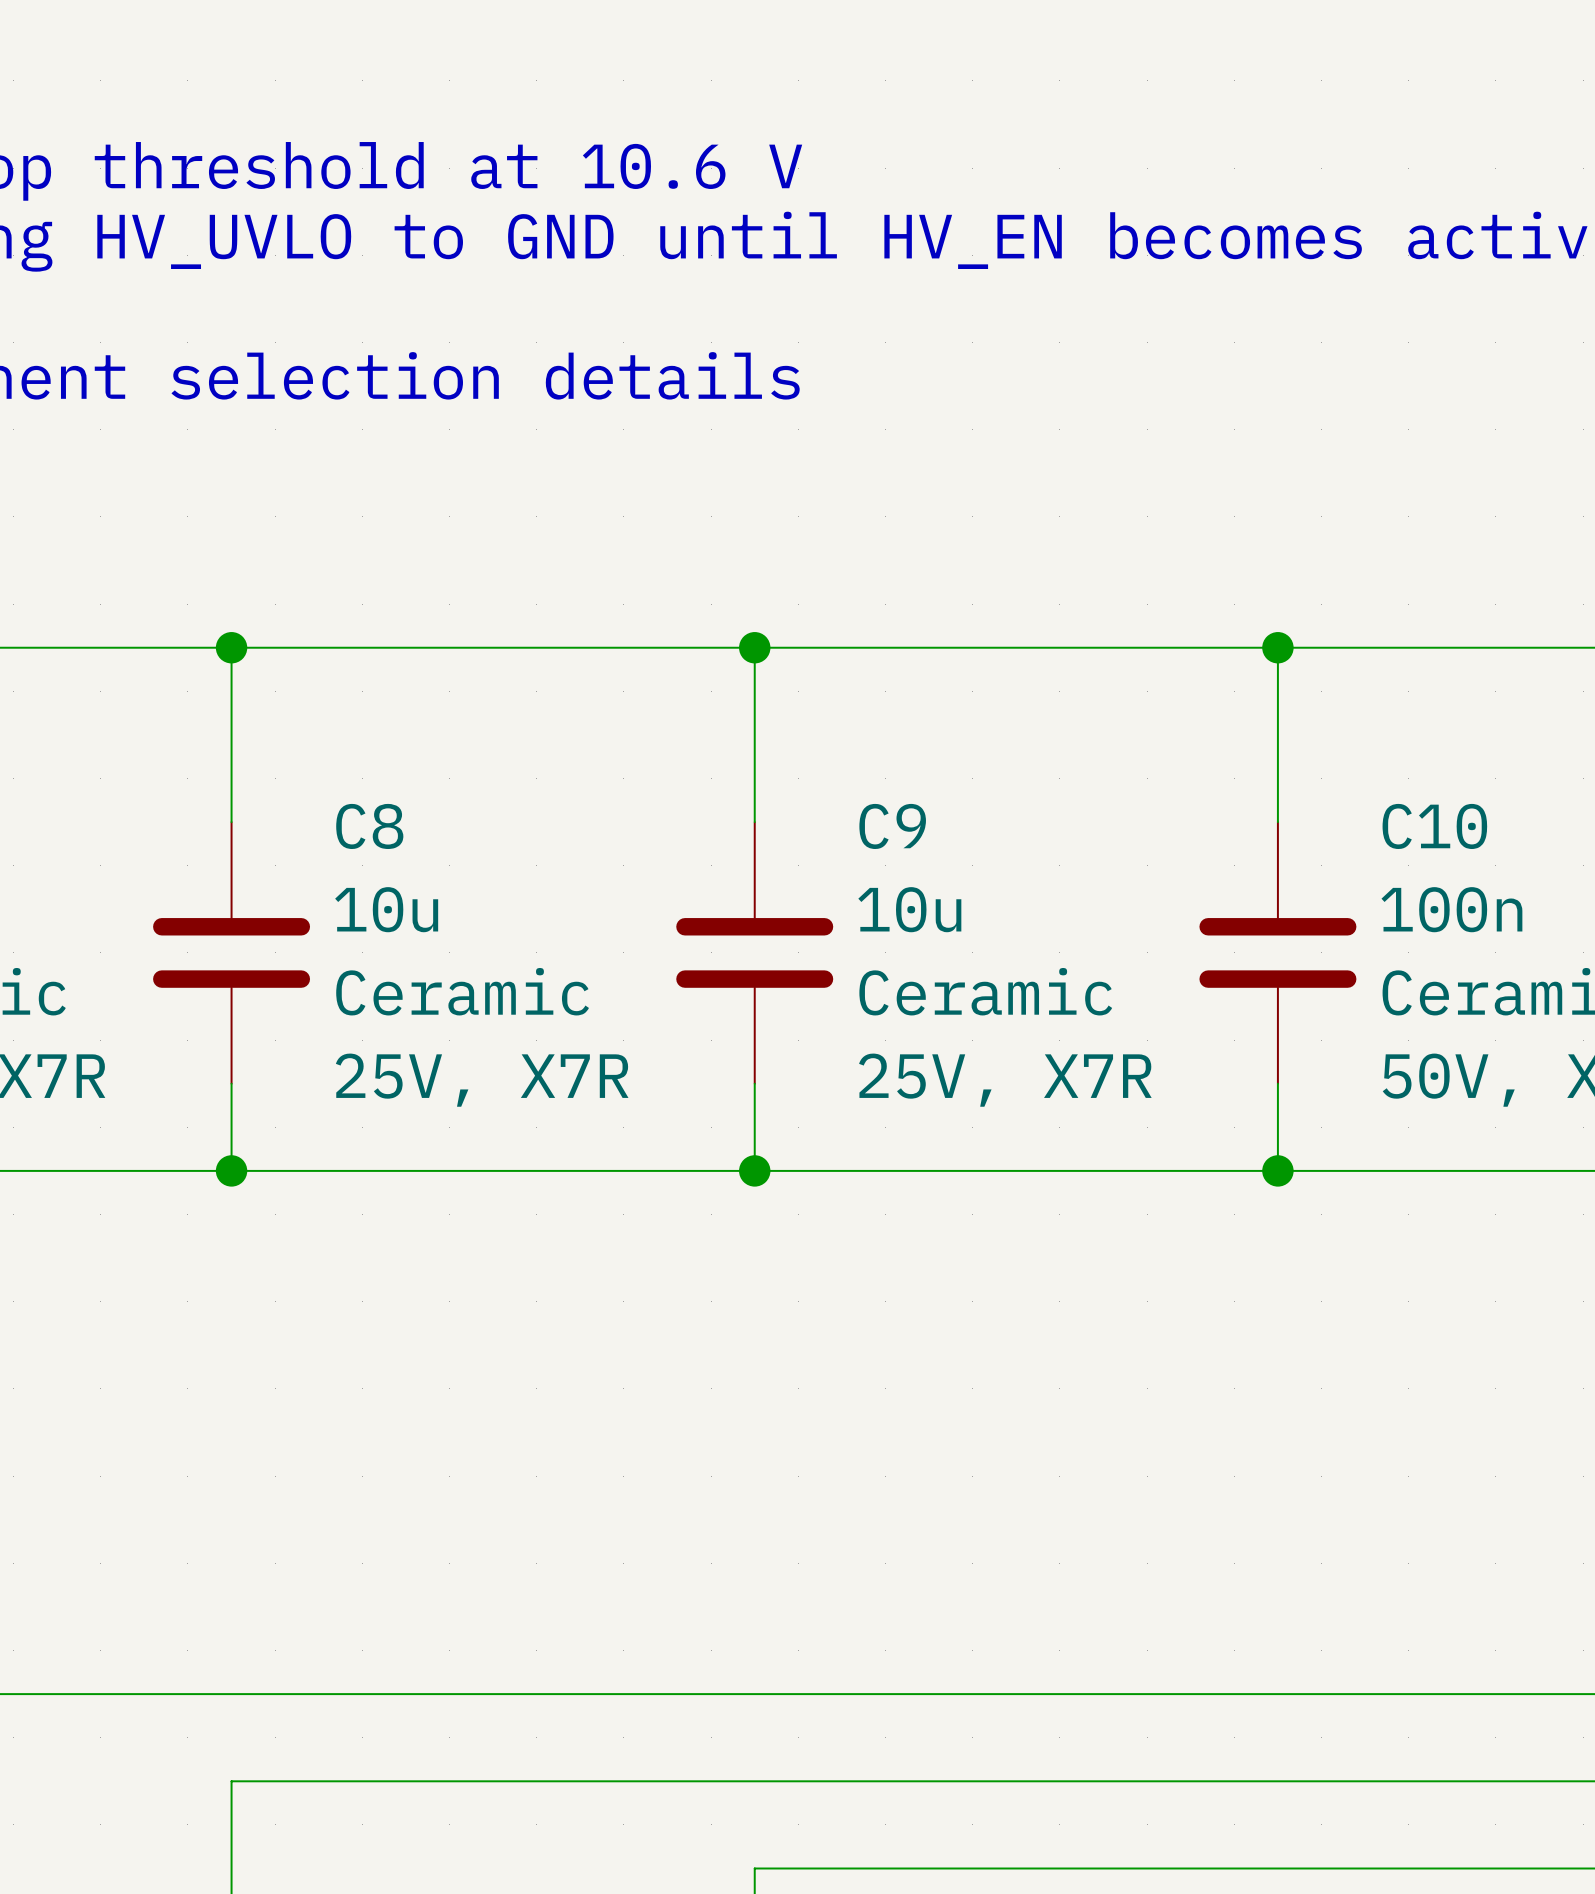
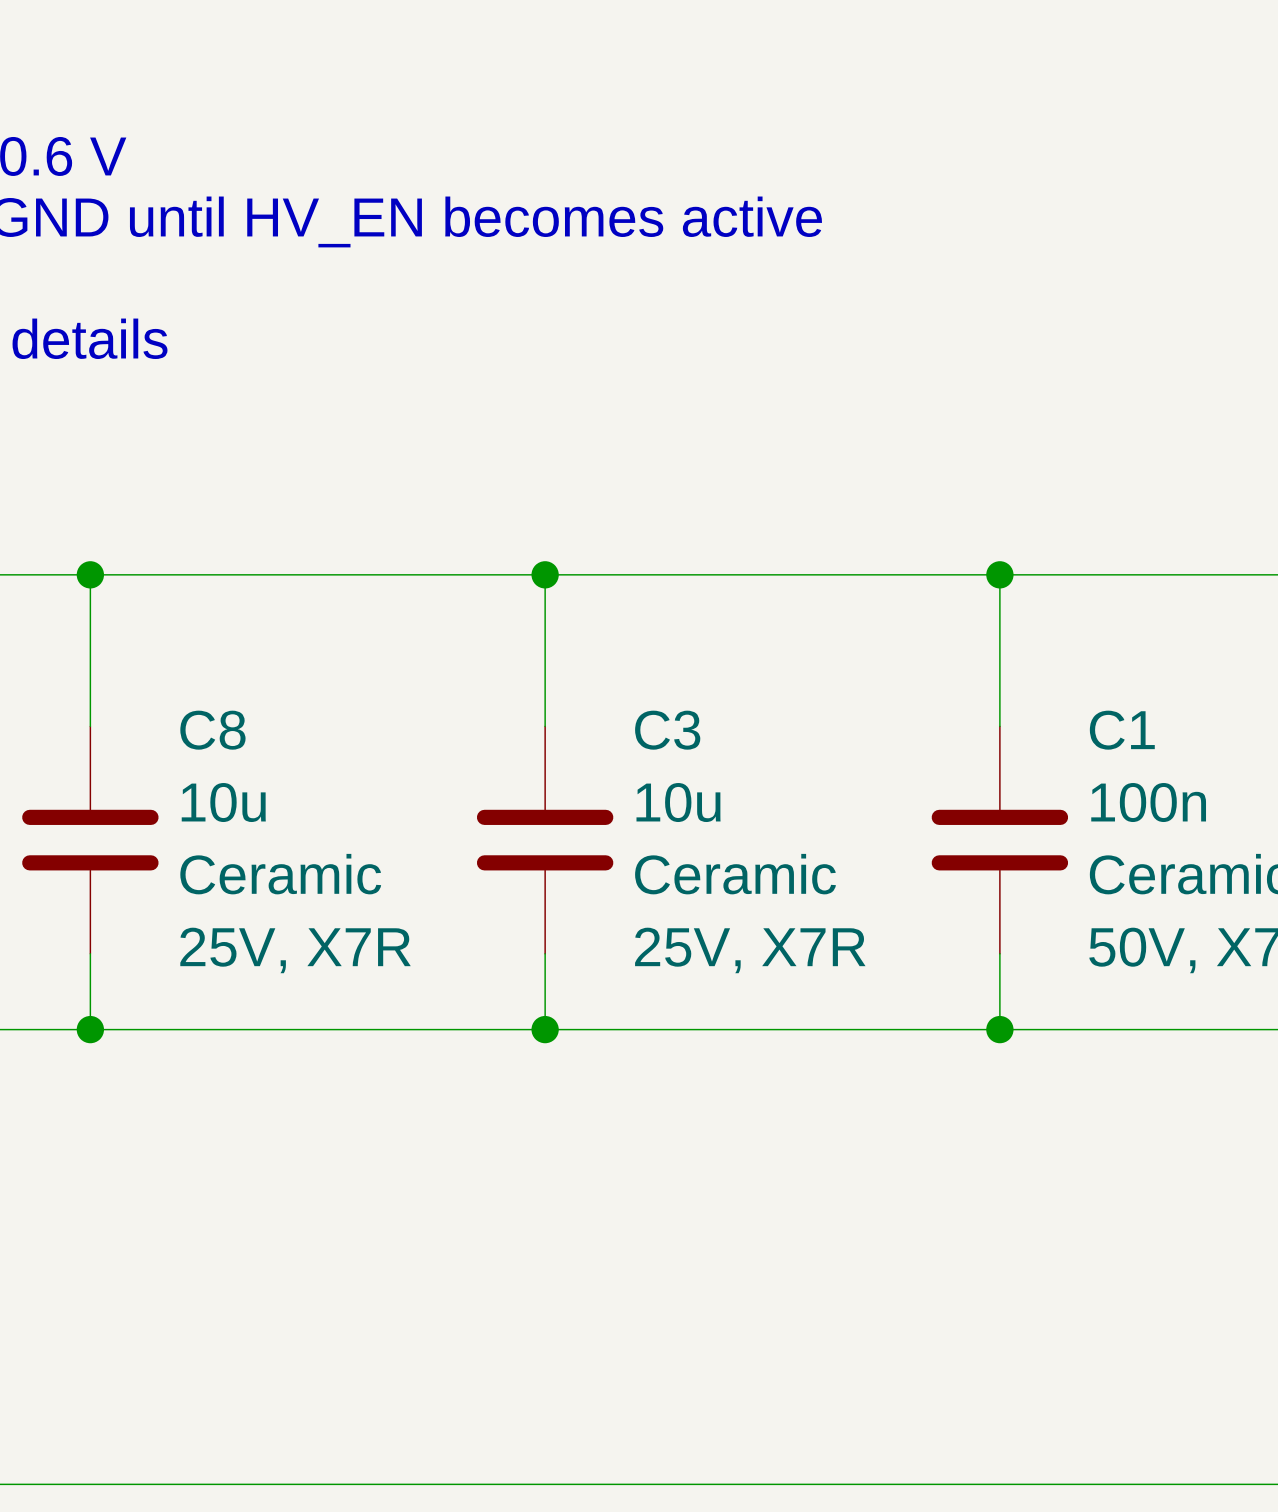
C9 name: C9 (892, 826) -> C3 (667, 730)
C10 name: C10 (1434, 826) -> C1 (1122, 730)

